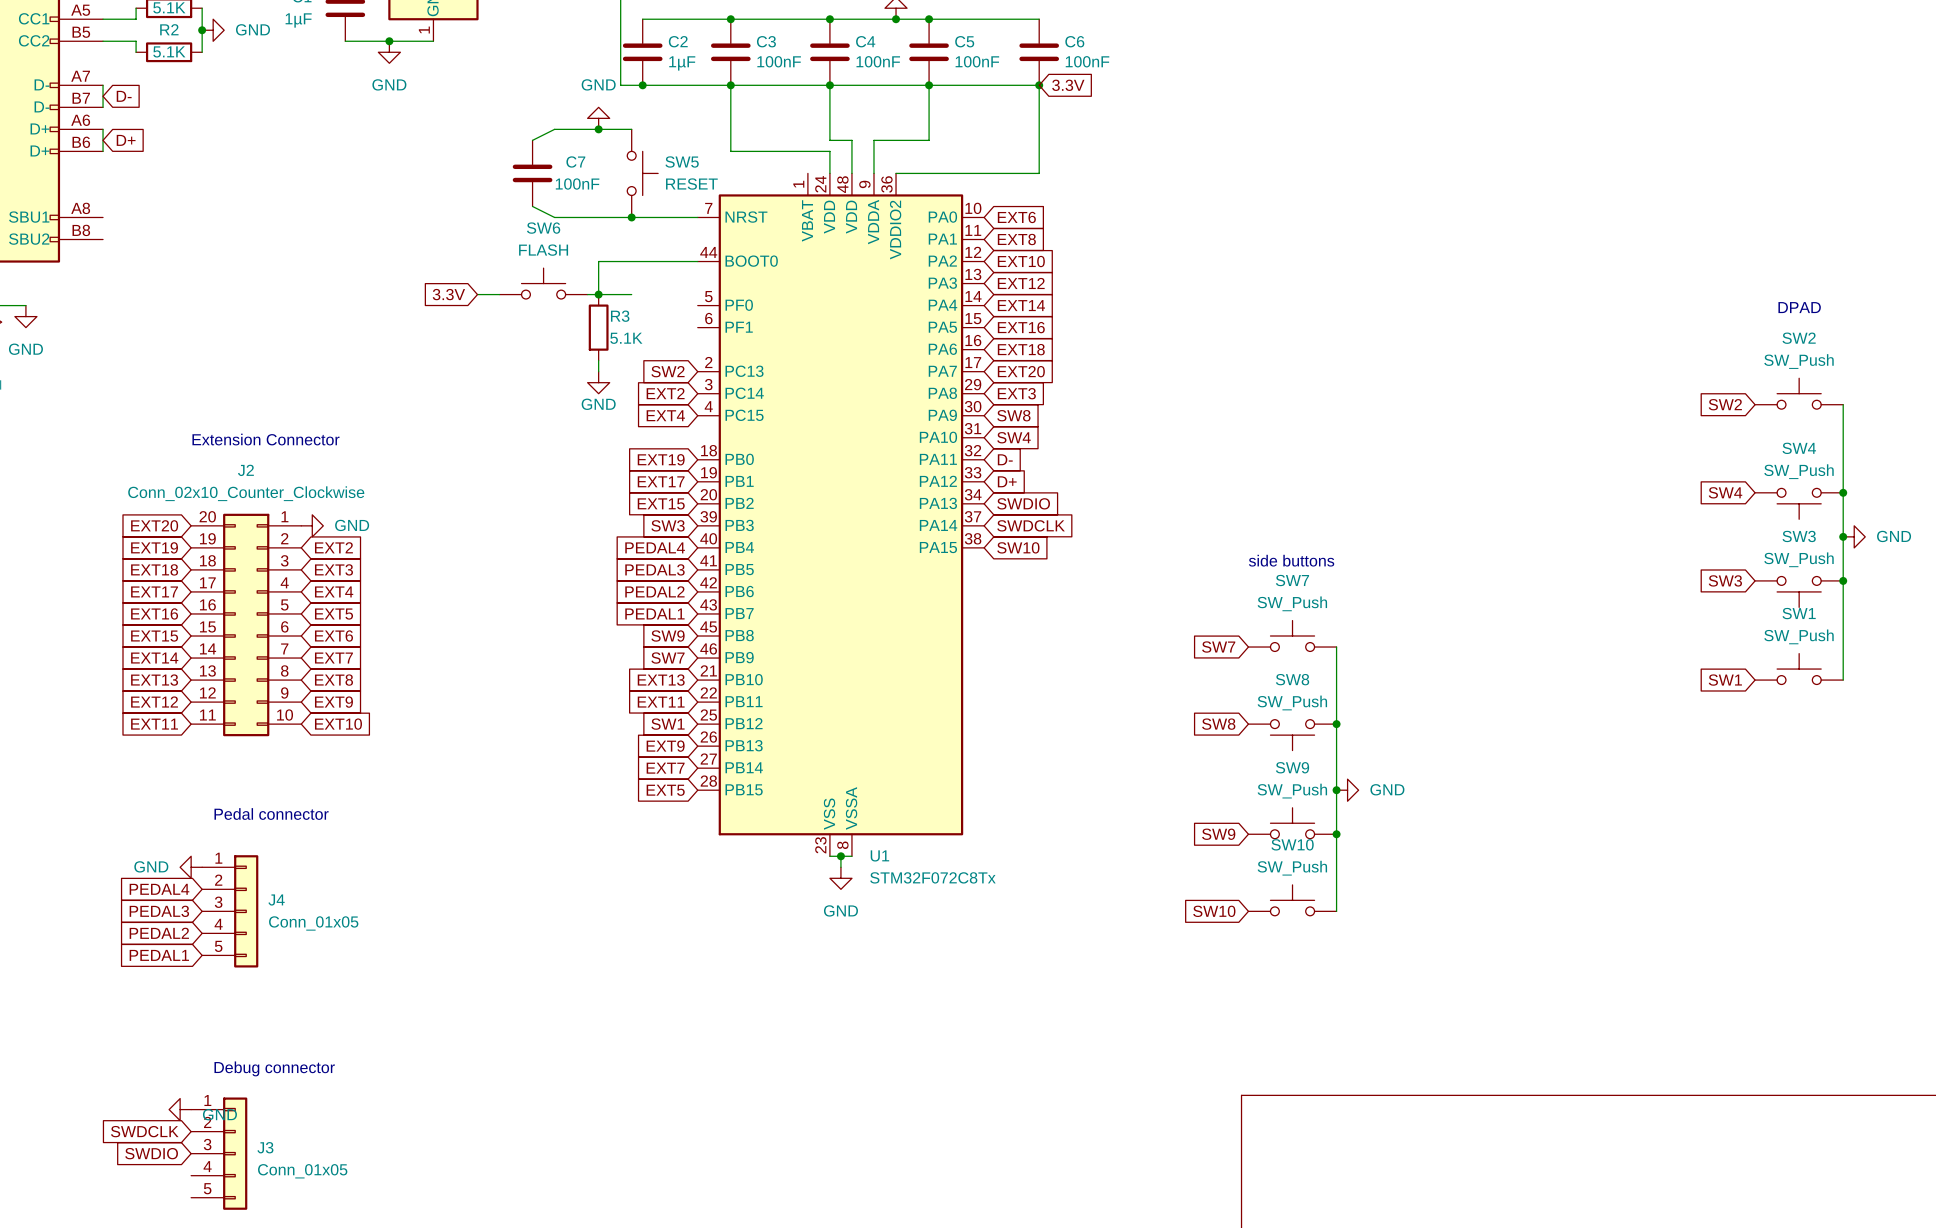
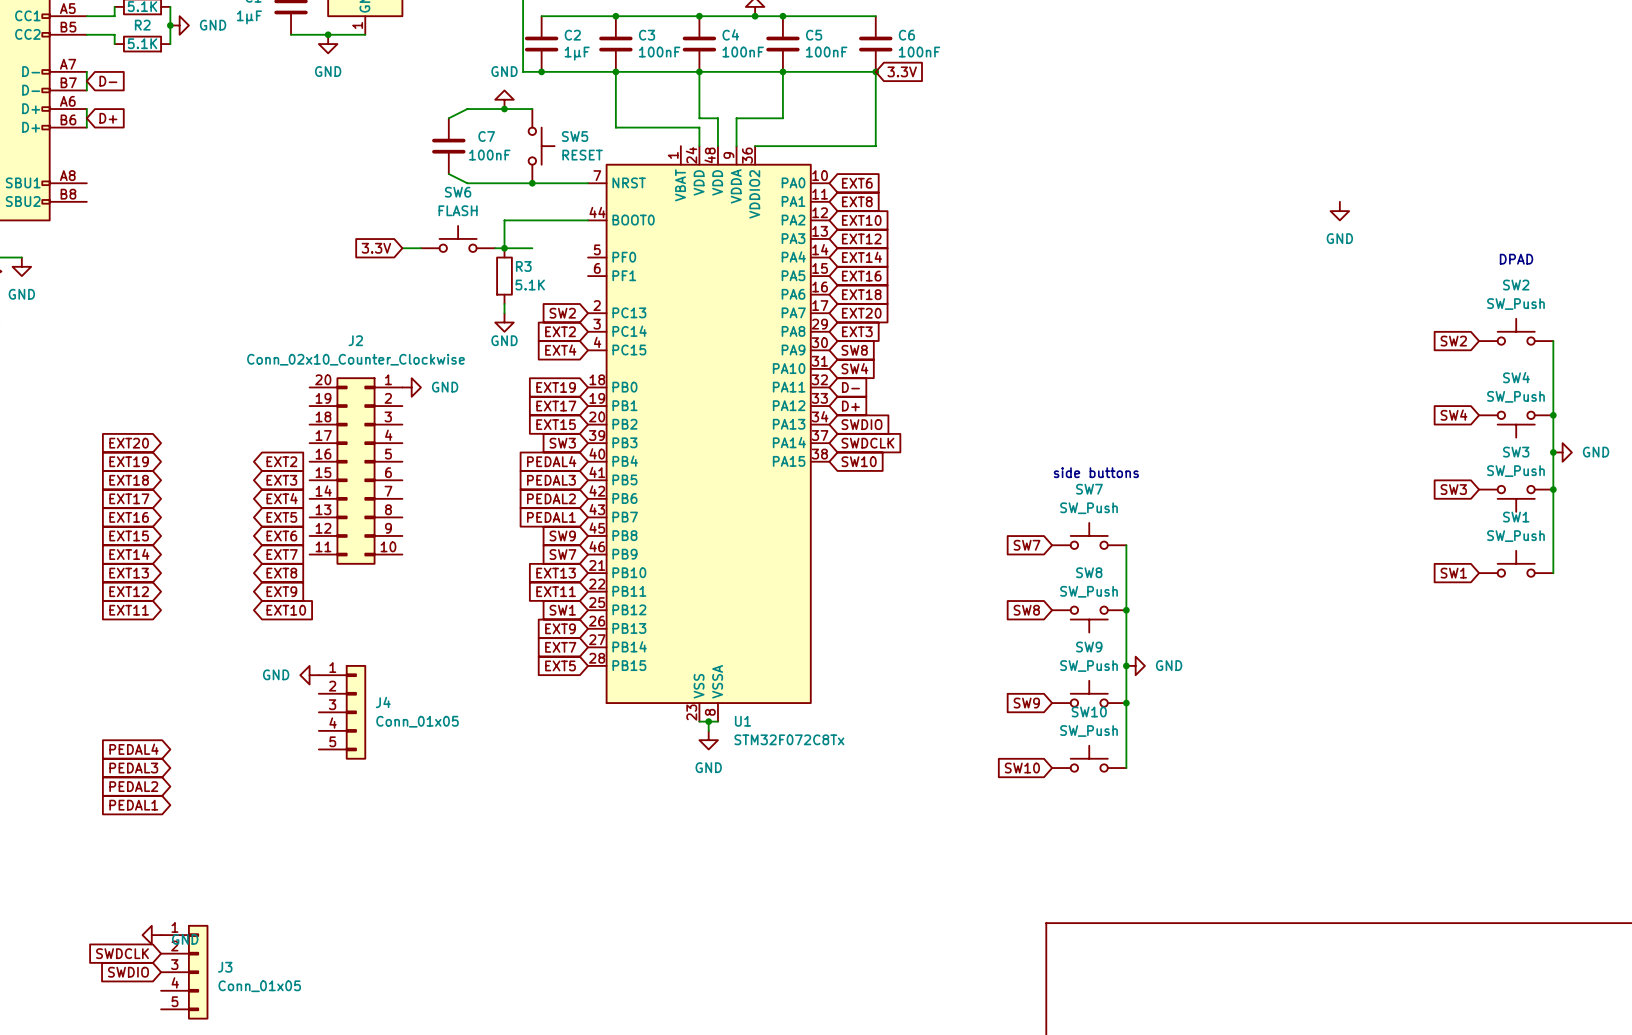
power symbol: none -> GND (1339, 211)
text: Extension Connector (265, 439) -> none
power symbol: none -> GND (411, 387)
power symbol: GND (312, 525) -> none
J2 position: (246, 624) -> (355, 471)
power symbol: none -> GND (309, 675)
text: Pedal connector (271, 814) -> none
power symbol: GND (191, 867) -> none
J4 position: (230, 911) -> (342, 712)
text: Debug connector (274, 1068) -> none

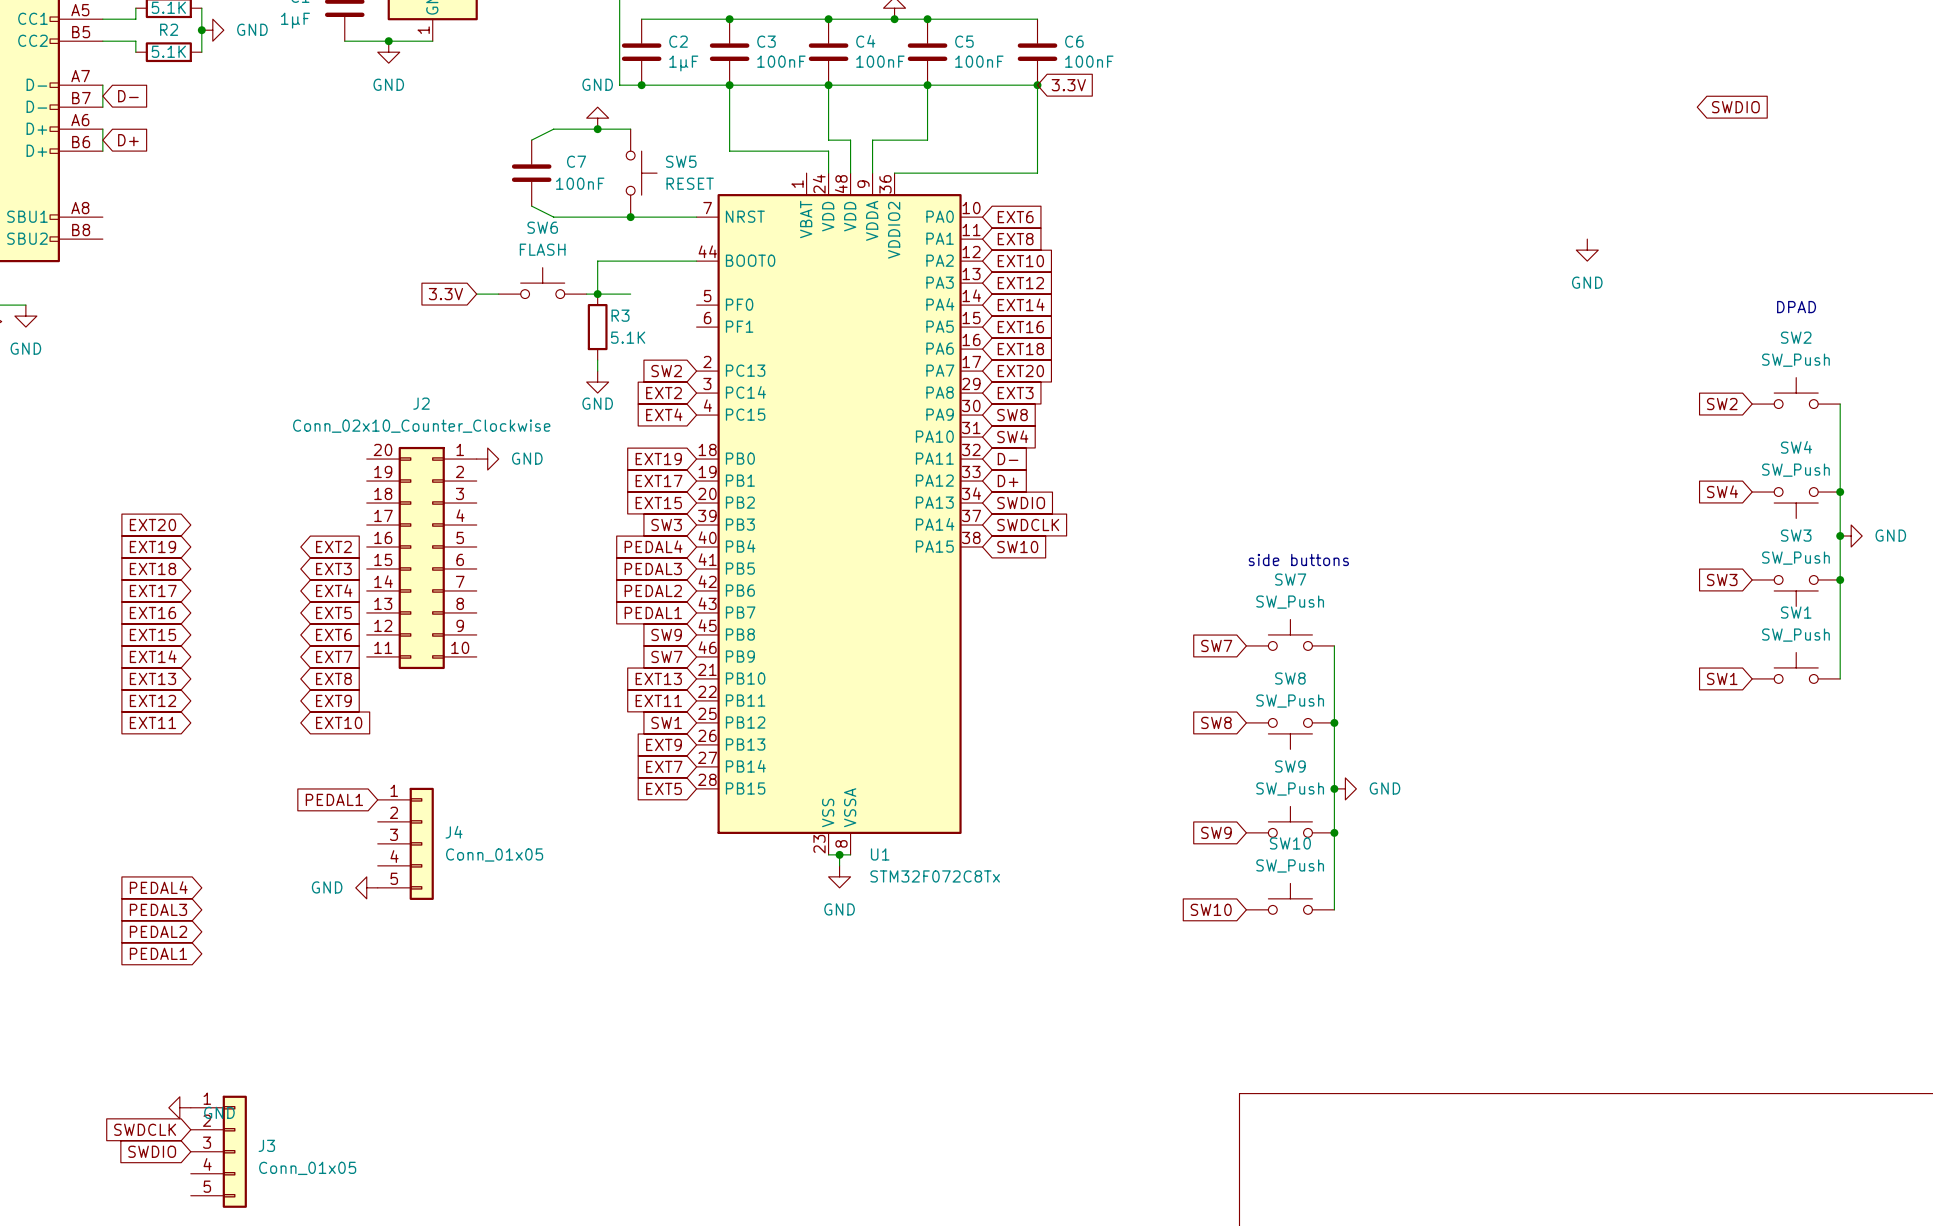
global label: none -> SWDIO (1735, 107)
global label: none -> PEDAL1 (334, 799)
power symbol position: GND (309, 675) -> GND (366, 887)

